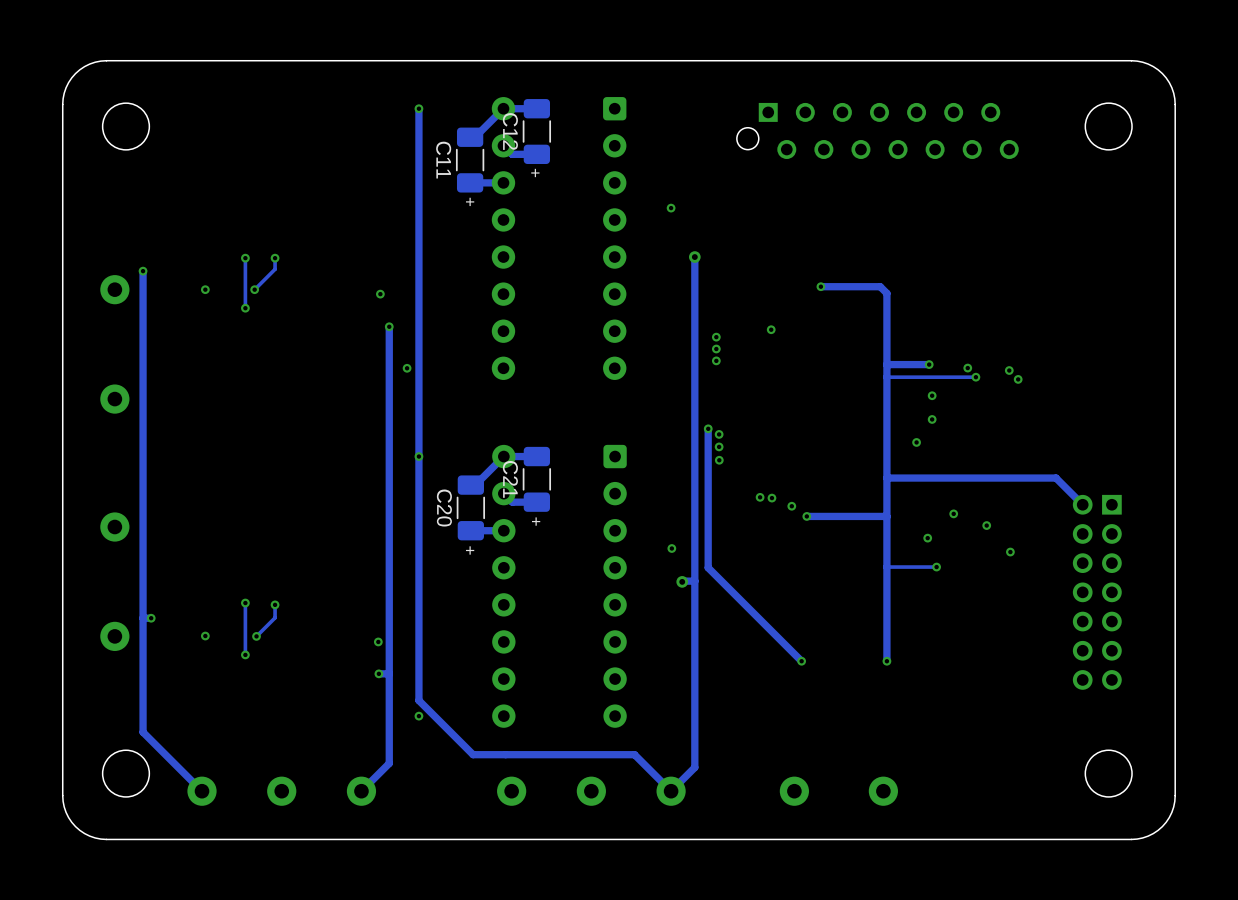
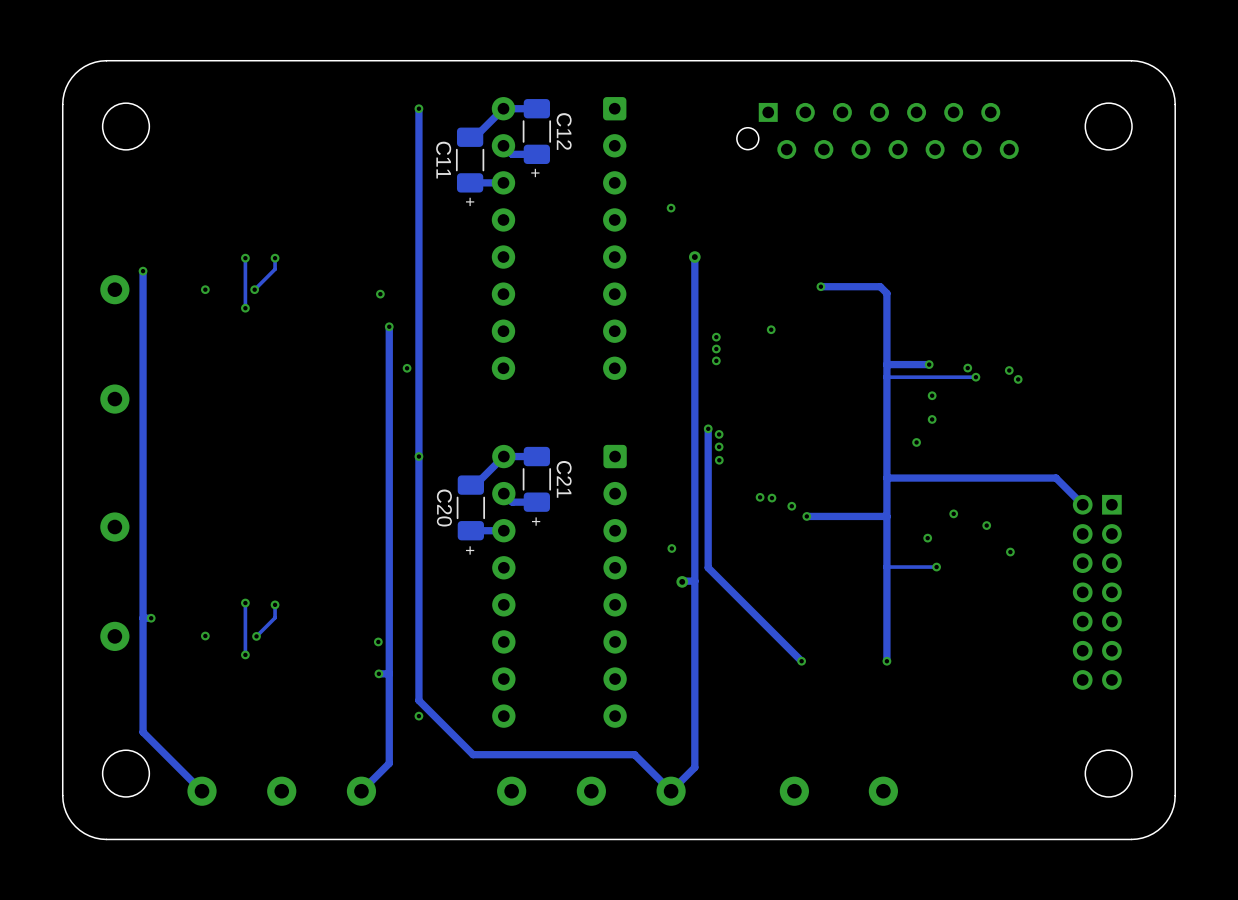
C12 name position: C12 (510, 131) -> C12 (564, 131)
C21 name position: C21 (510, 479) -> C21 (564, 479)

